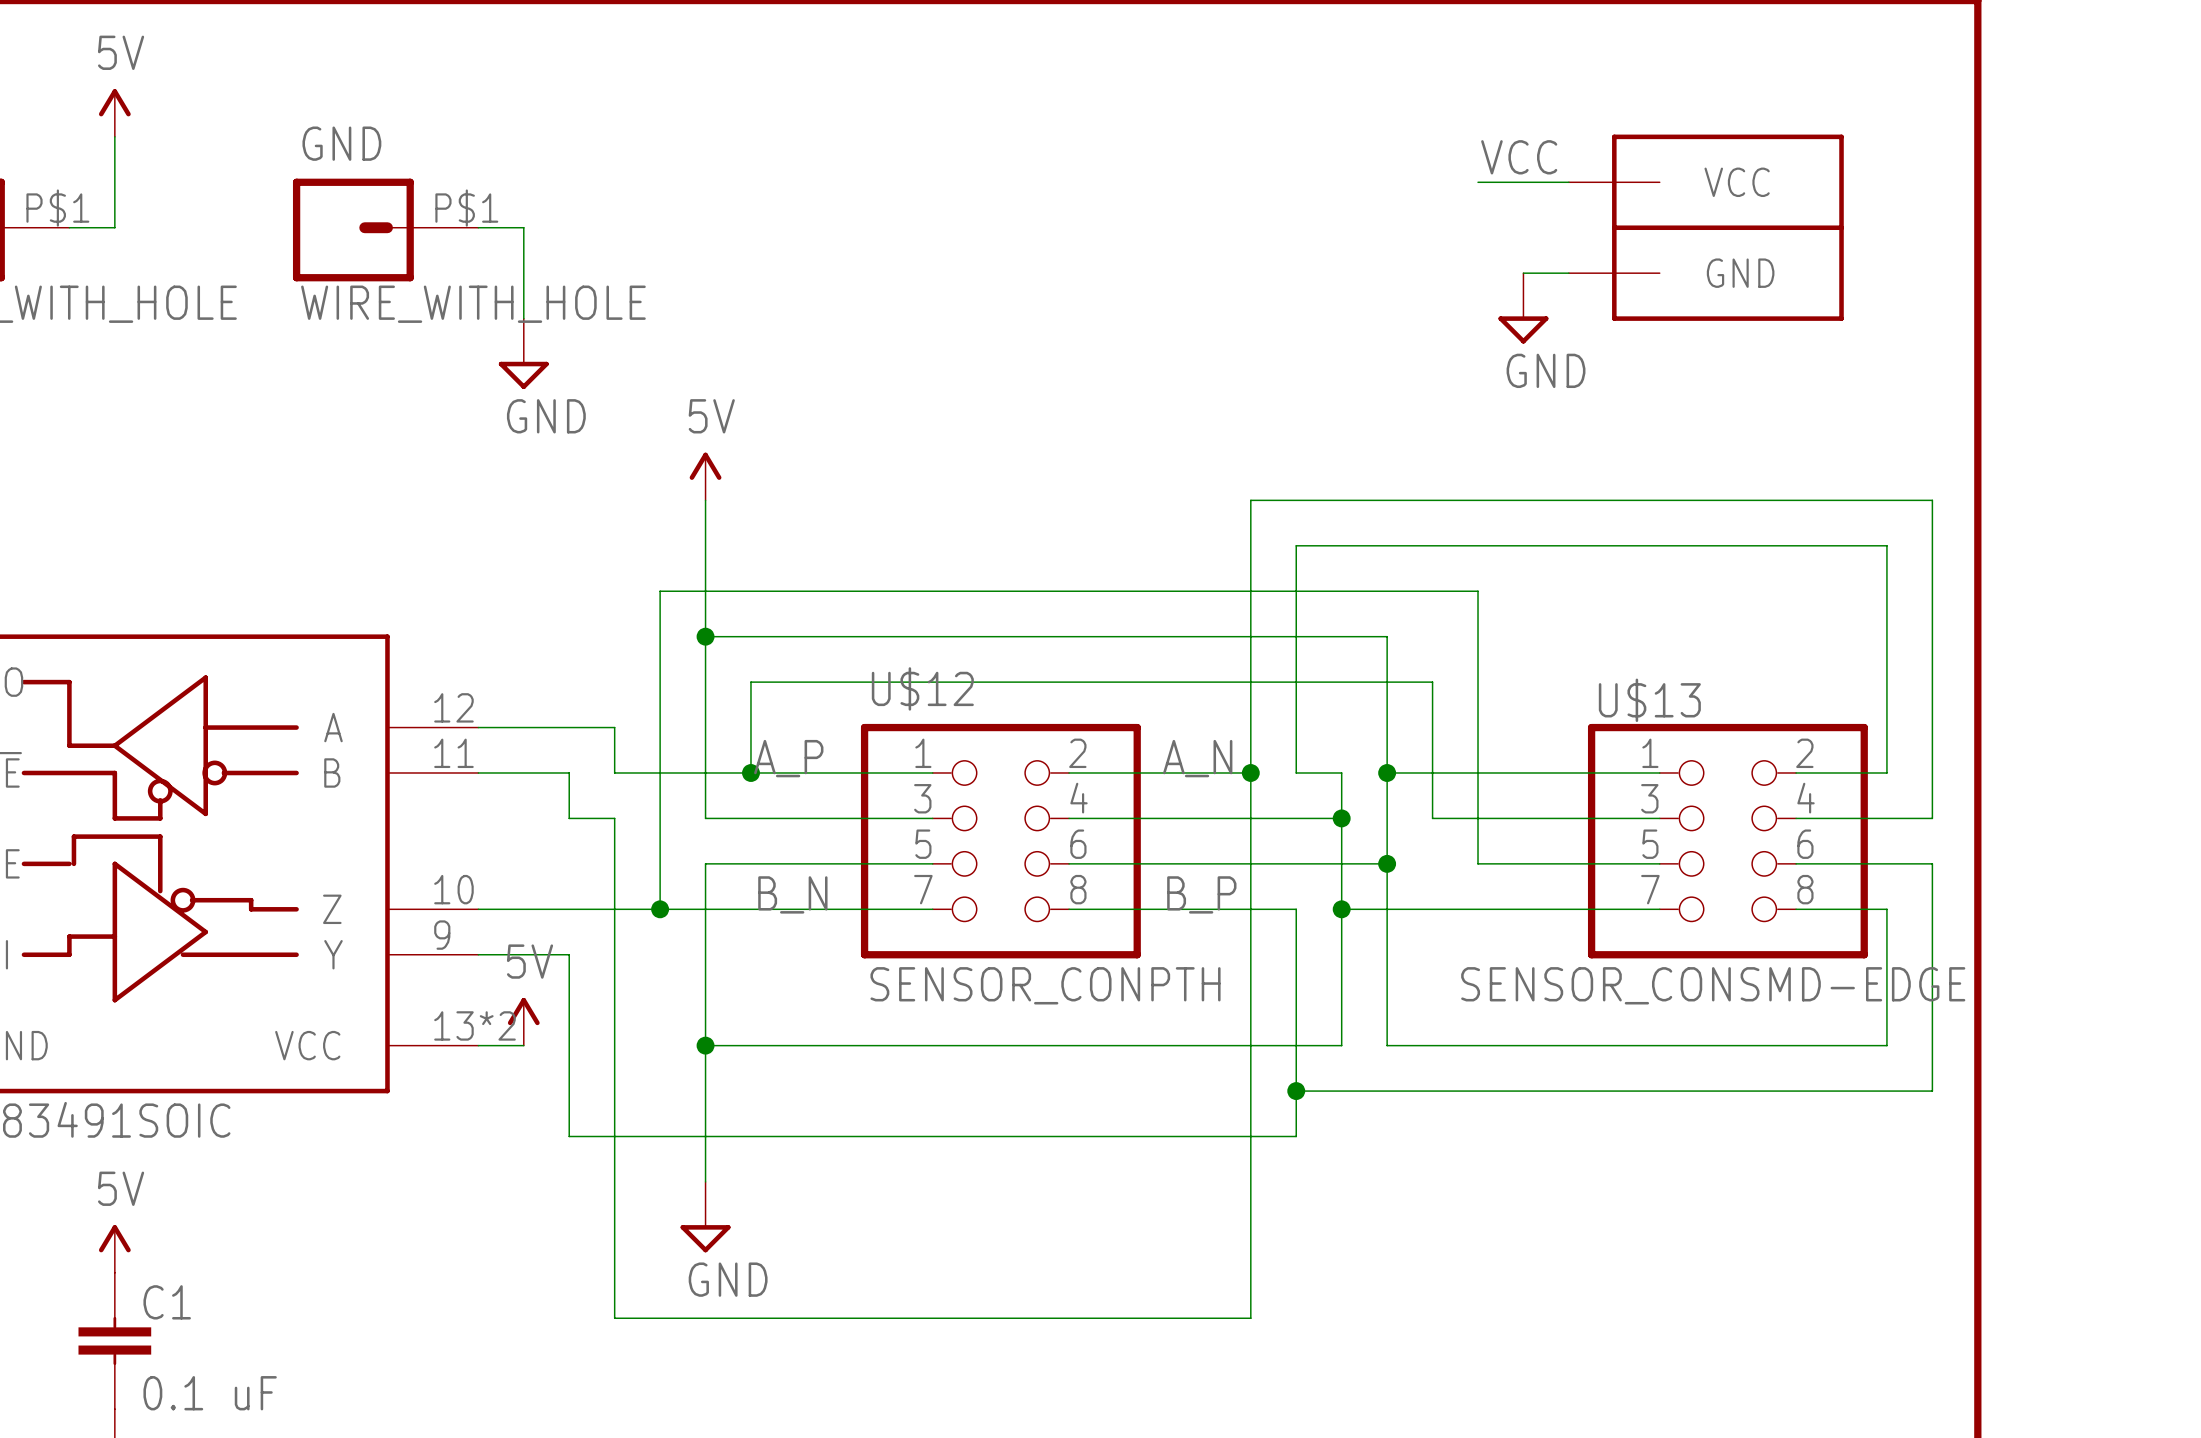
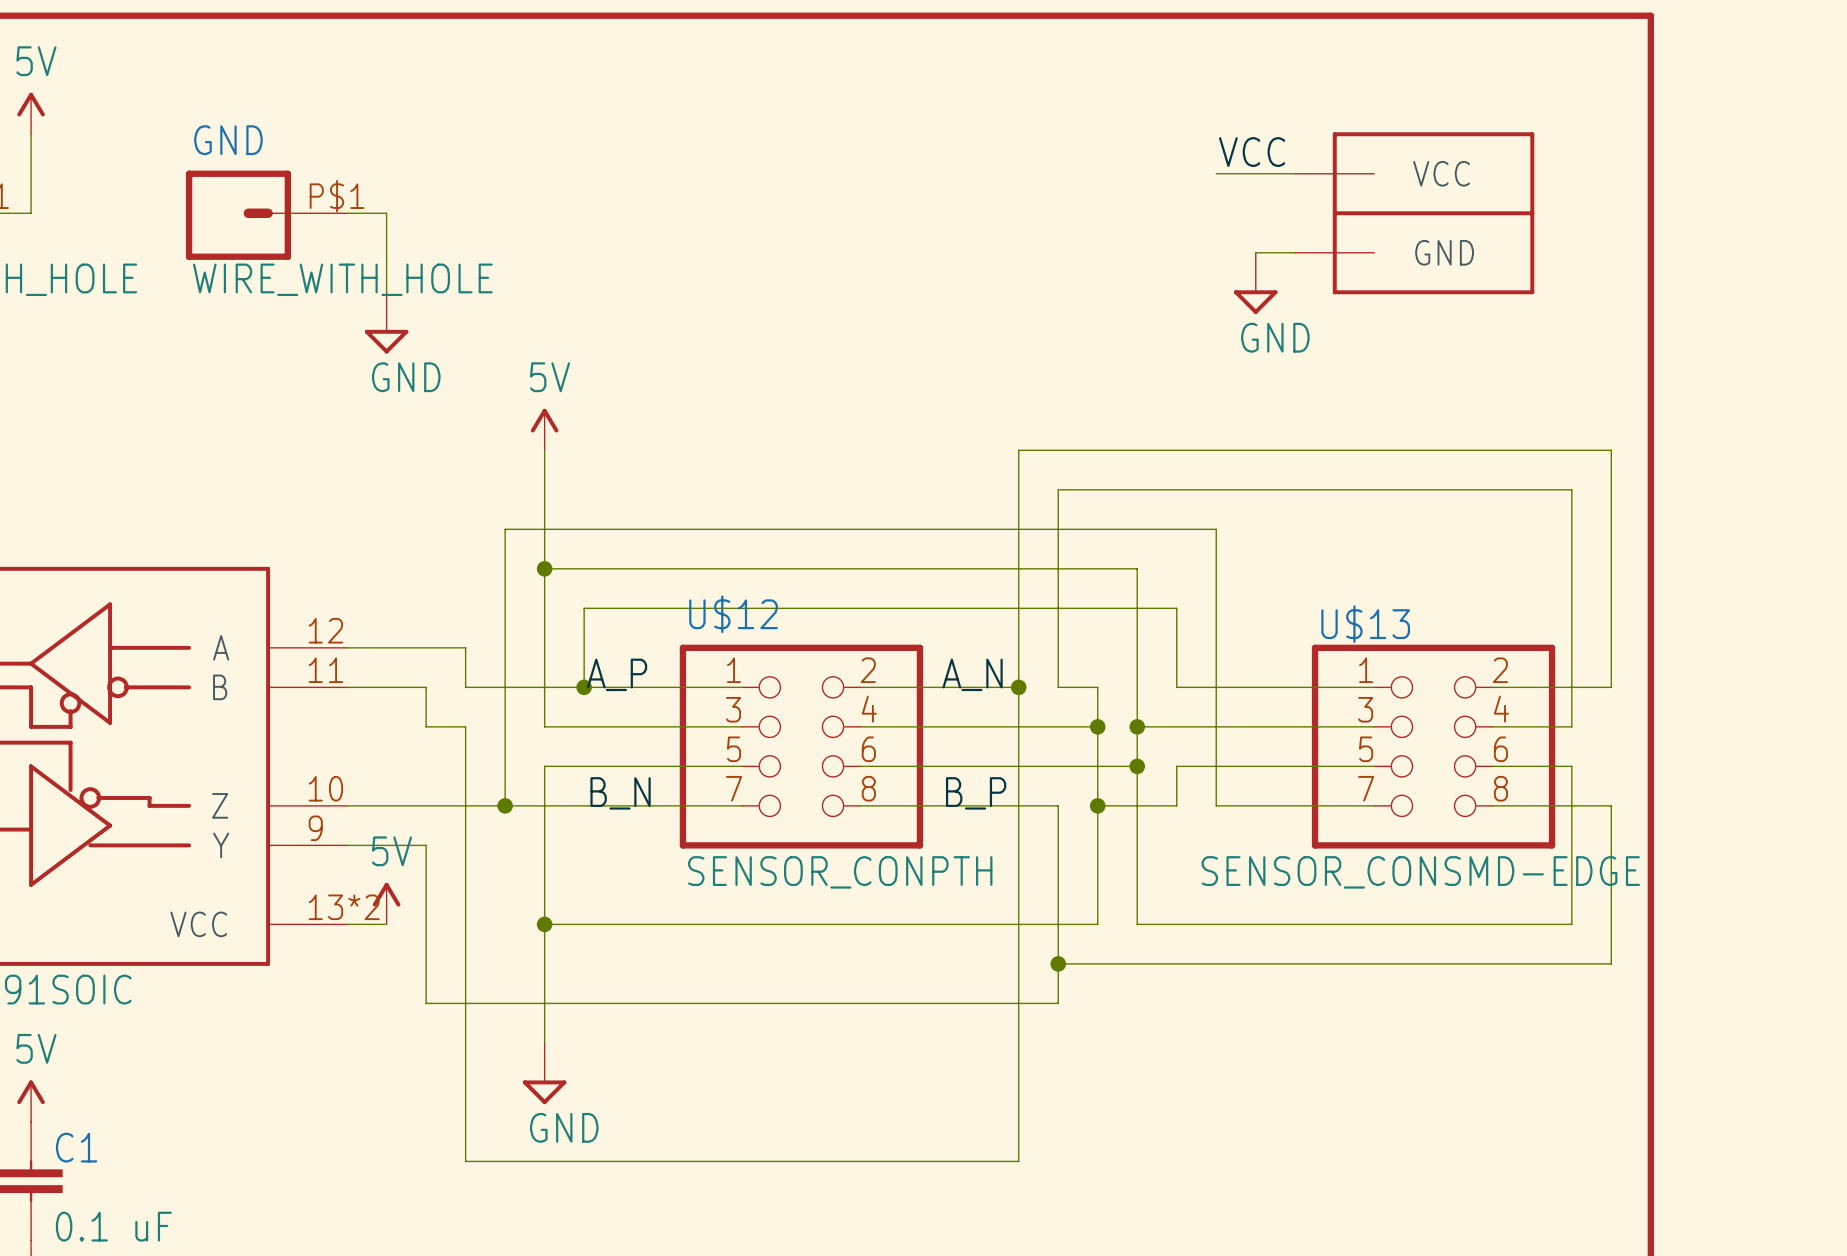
wire: (1387, 772) (1432, 772) (1432, 818) -> (1137, 726) (1176, 726)
junction position: (1387, 772) -> (1137, 726)
wire: (1932, 772) (1932, 818) (1886, 818) -> (1611, 687) (1571, 687) (1571, 726)
wire: (1886, 863) (1932, 863) (1932, 909) -> (1571, 766) (1571, 805) (1611, 805)
wire: (1432, 909) (1478, 909) -> (1176, 805) (1176, 766) (1216, 766) (1216, 805)

